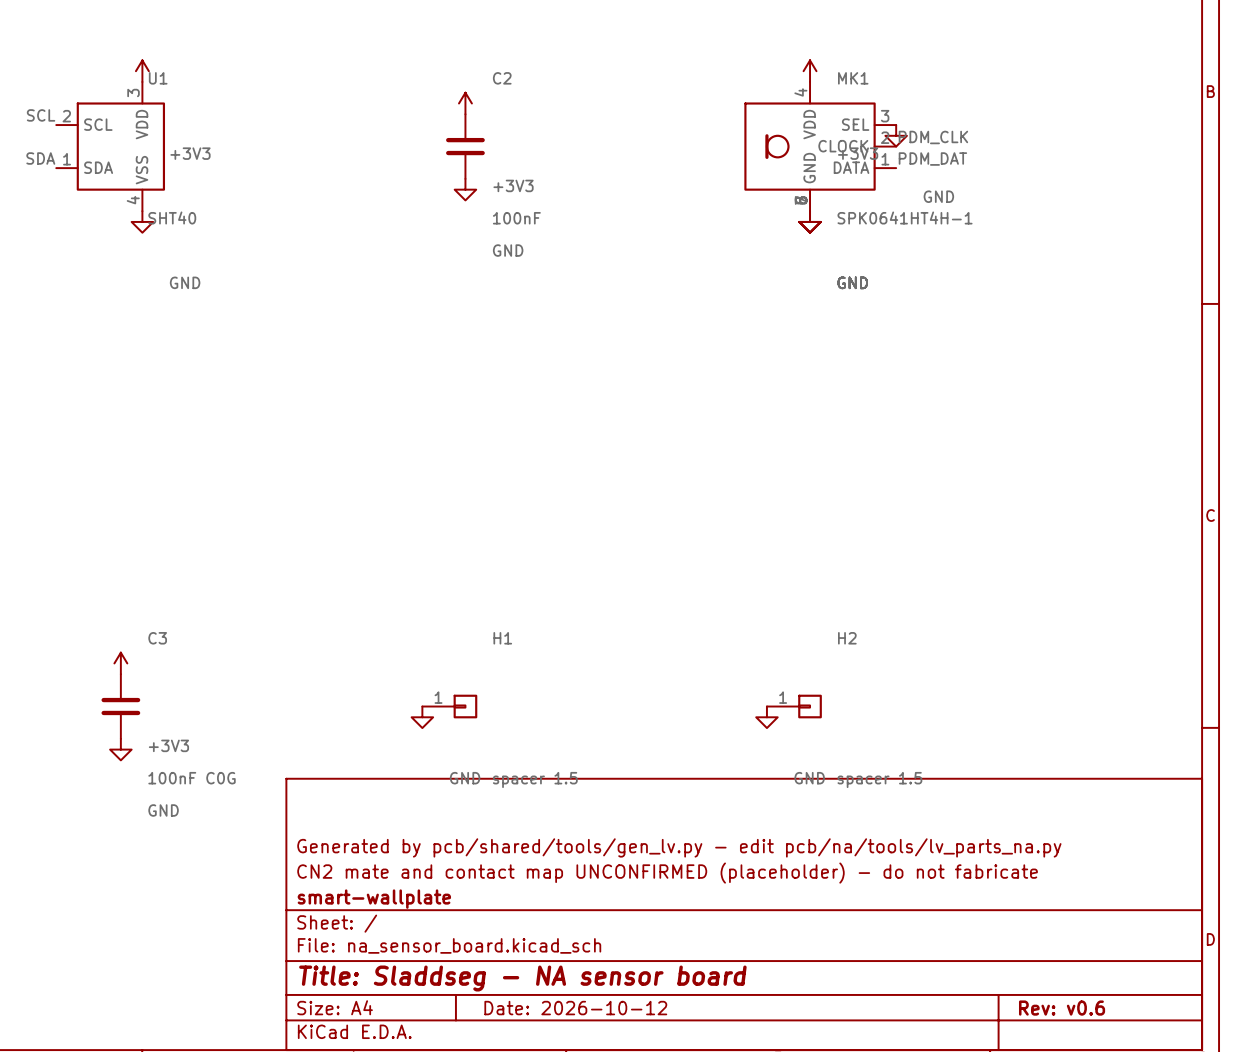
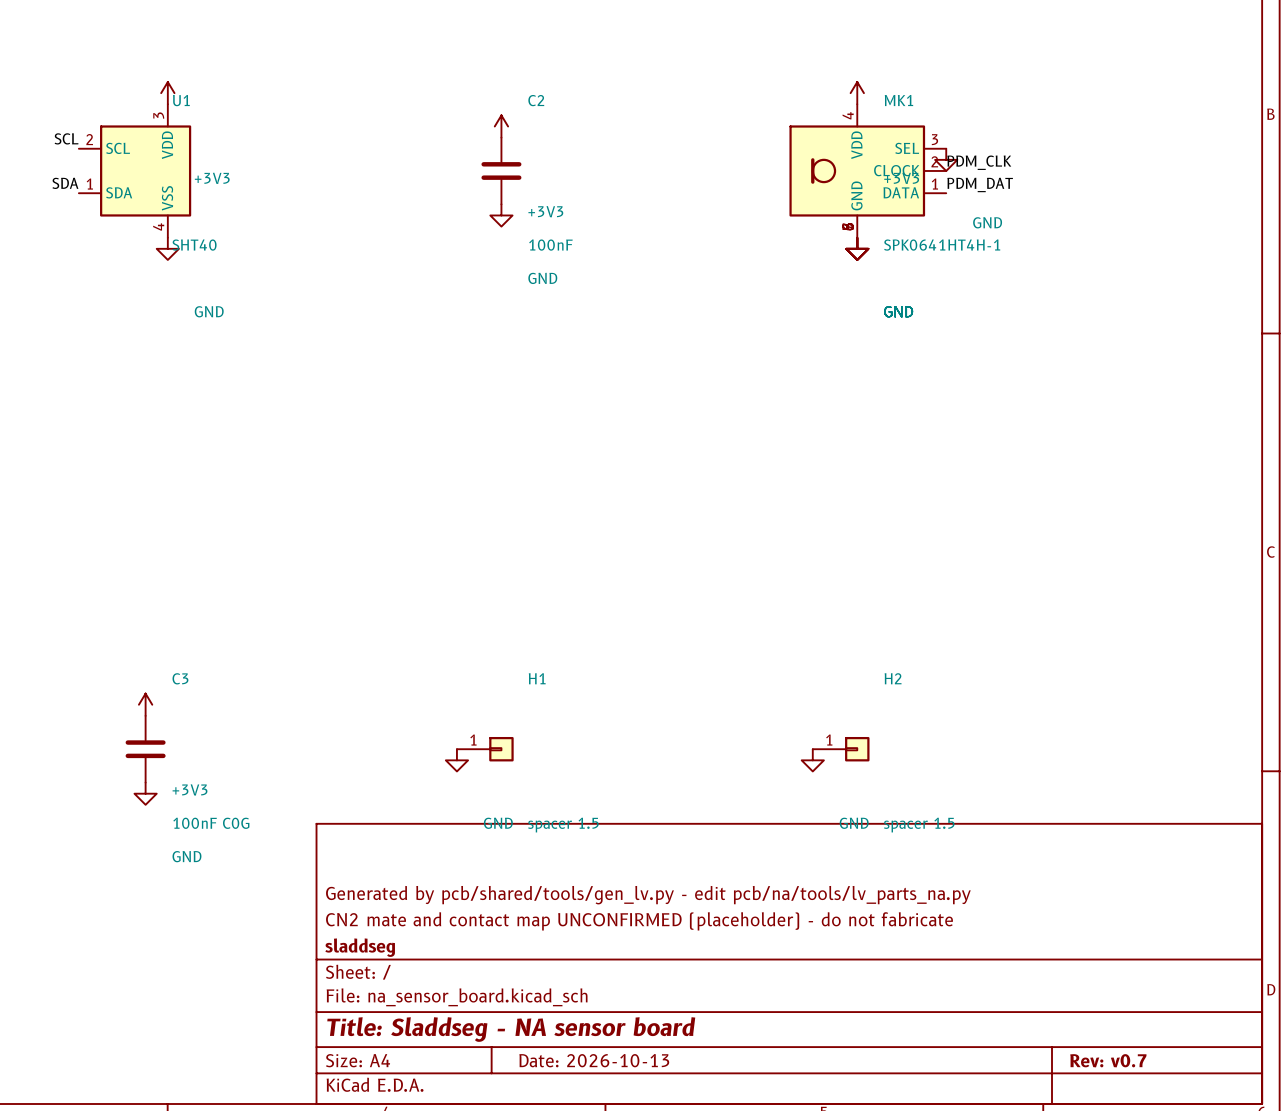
title block: smart-wallplate (374, 899) -> sladdseg (360, 947)
title block: Date: 2026-10-12 (575, 1008) -> Date: 2026-10-13 (594, 1060)
title block: Rev: v0.6 (1062, 1008) -> Rev: v0.7 (1108, 1060)

